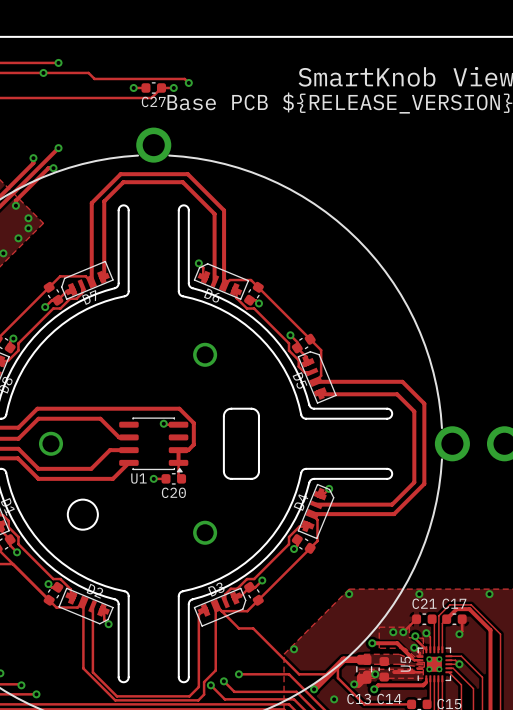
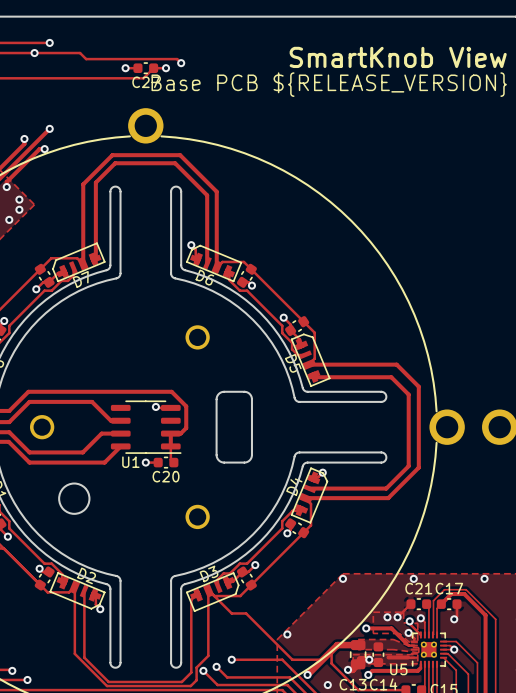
U1 footprint: [119, 417, 189, 473] -> [110, 400, 182, 454]
U5 name rotation: 0° (405, 664) -> 90° clockwise (398, 669)

